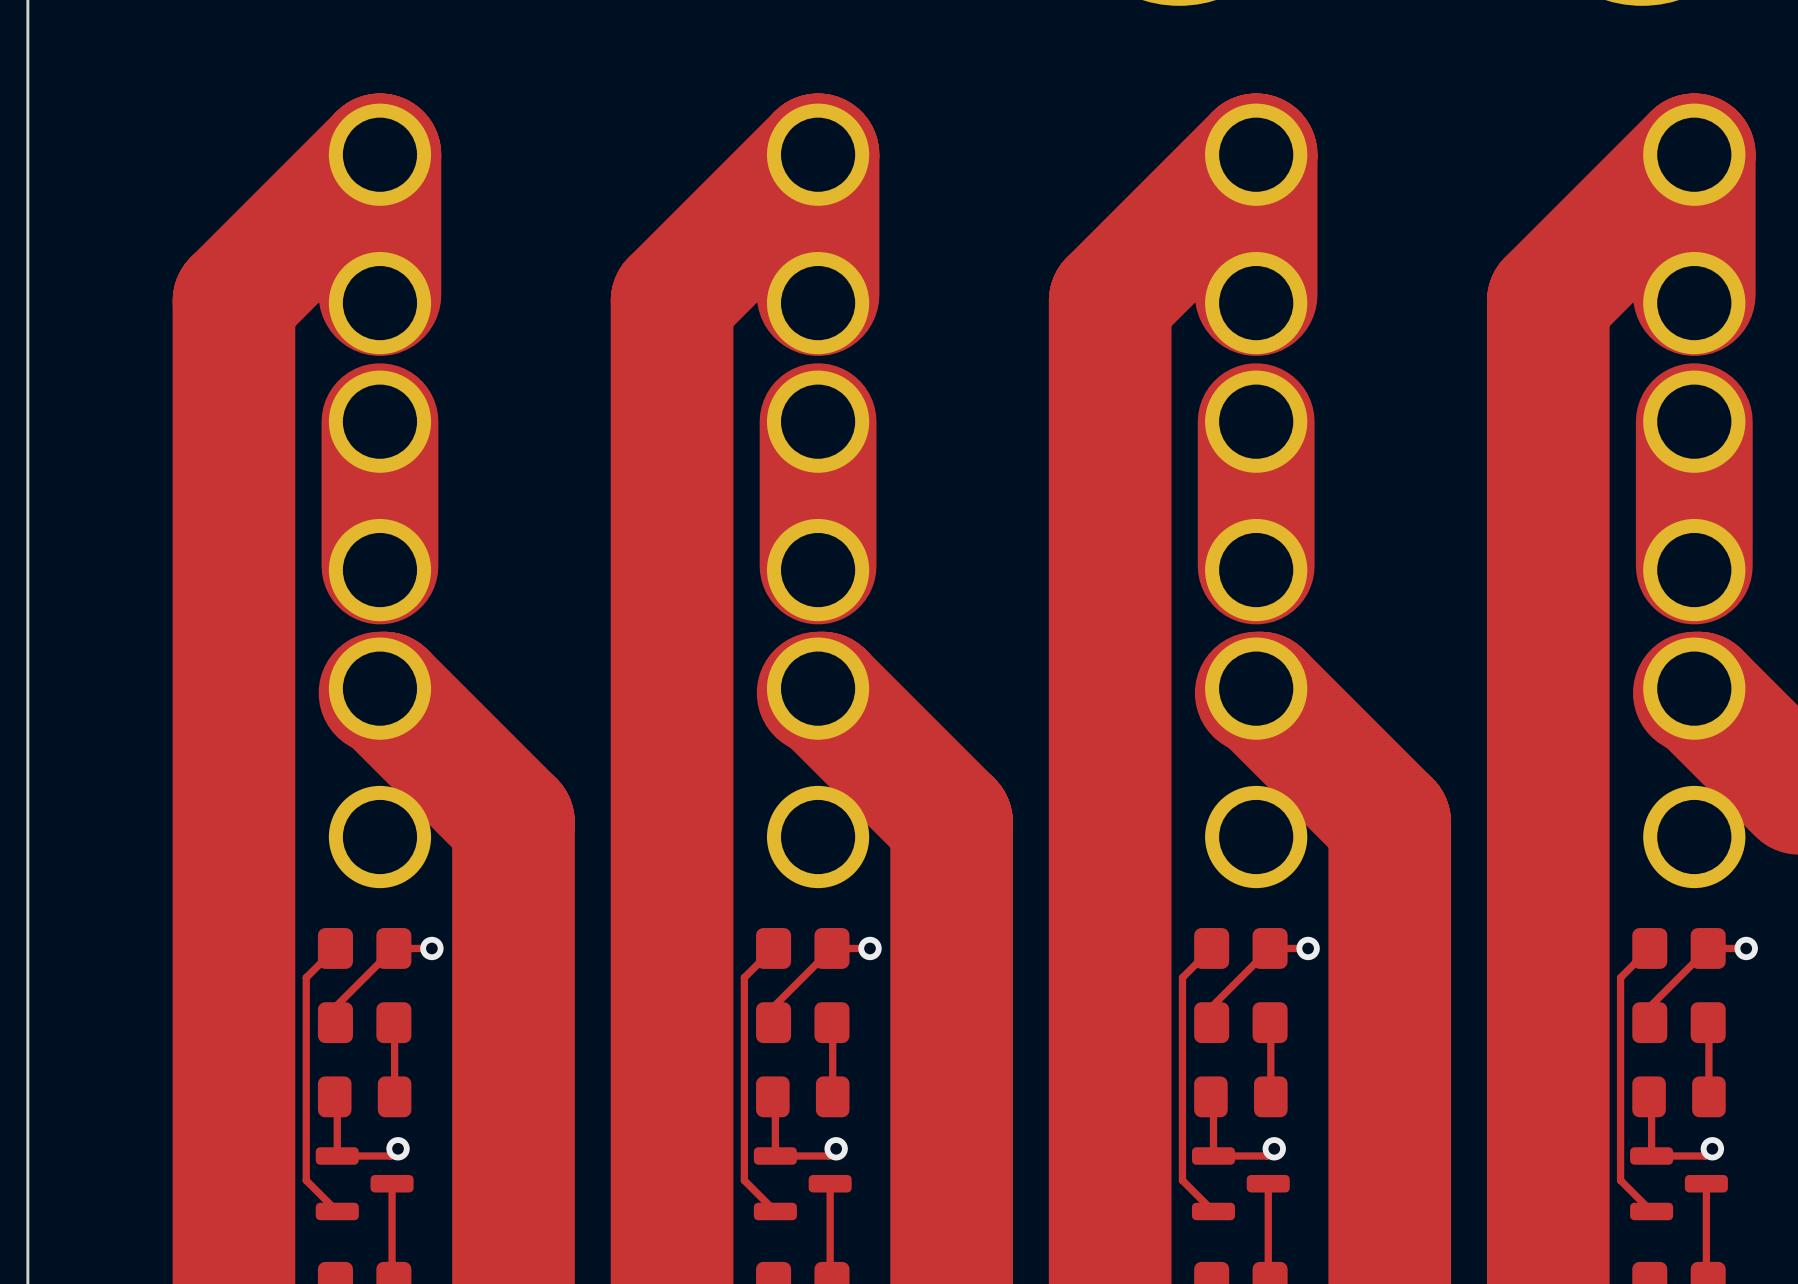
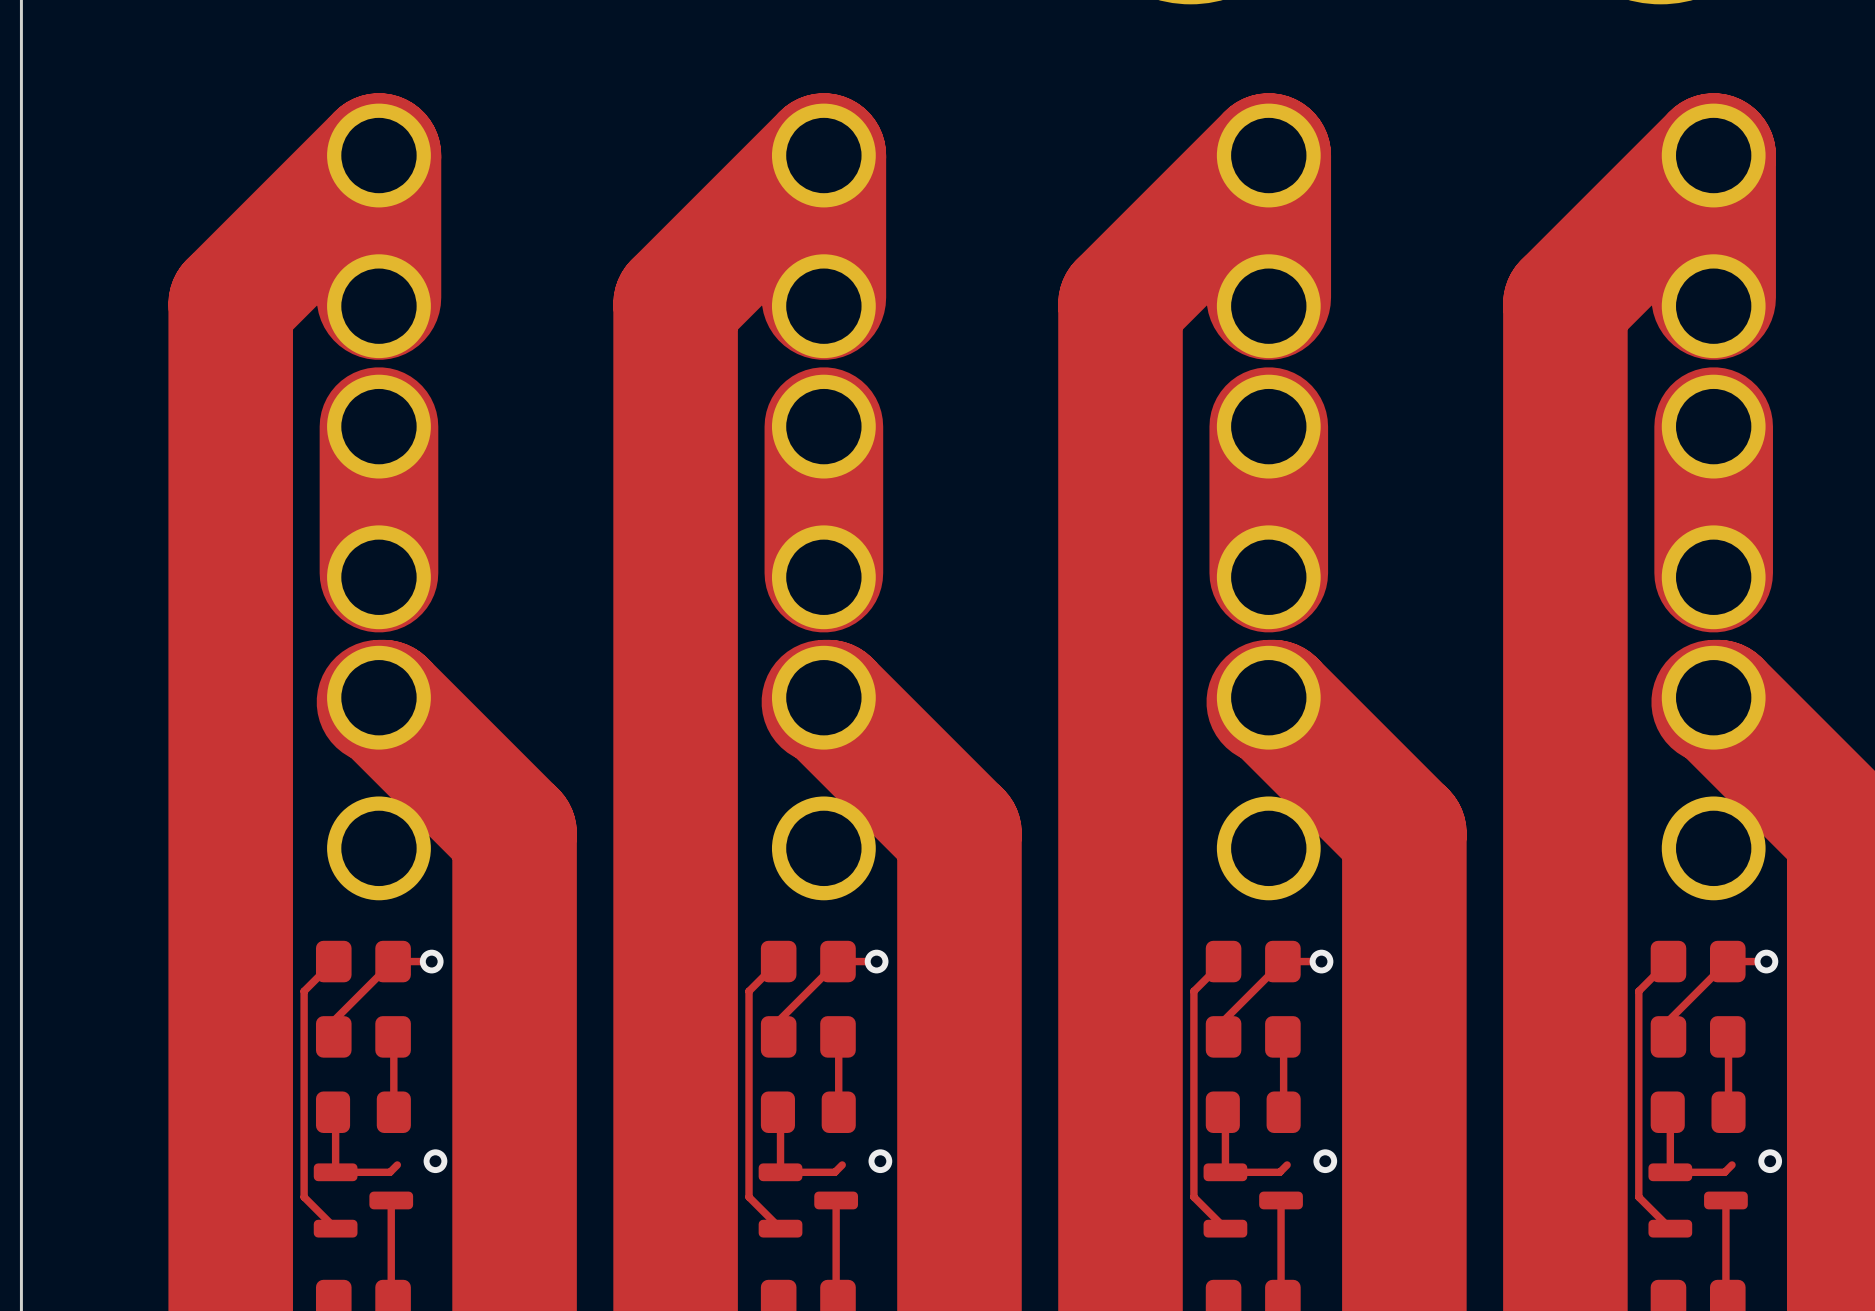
via position: (398, 1148) -> (435, 1161)
via position: (836, 1148) -> (880, 1161)
via position: (1274, 1148) -> (1325, 1161)
via position: (1712, 1148) -> (1770, 1161)

